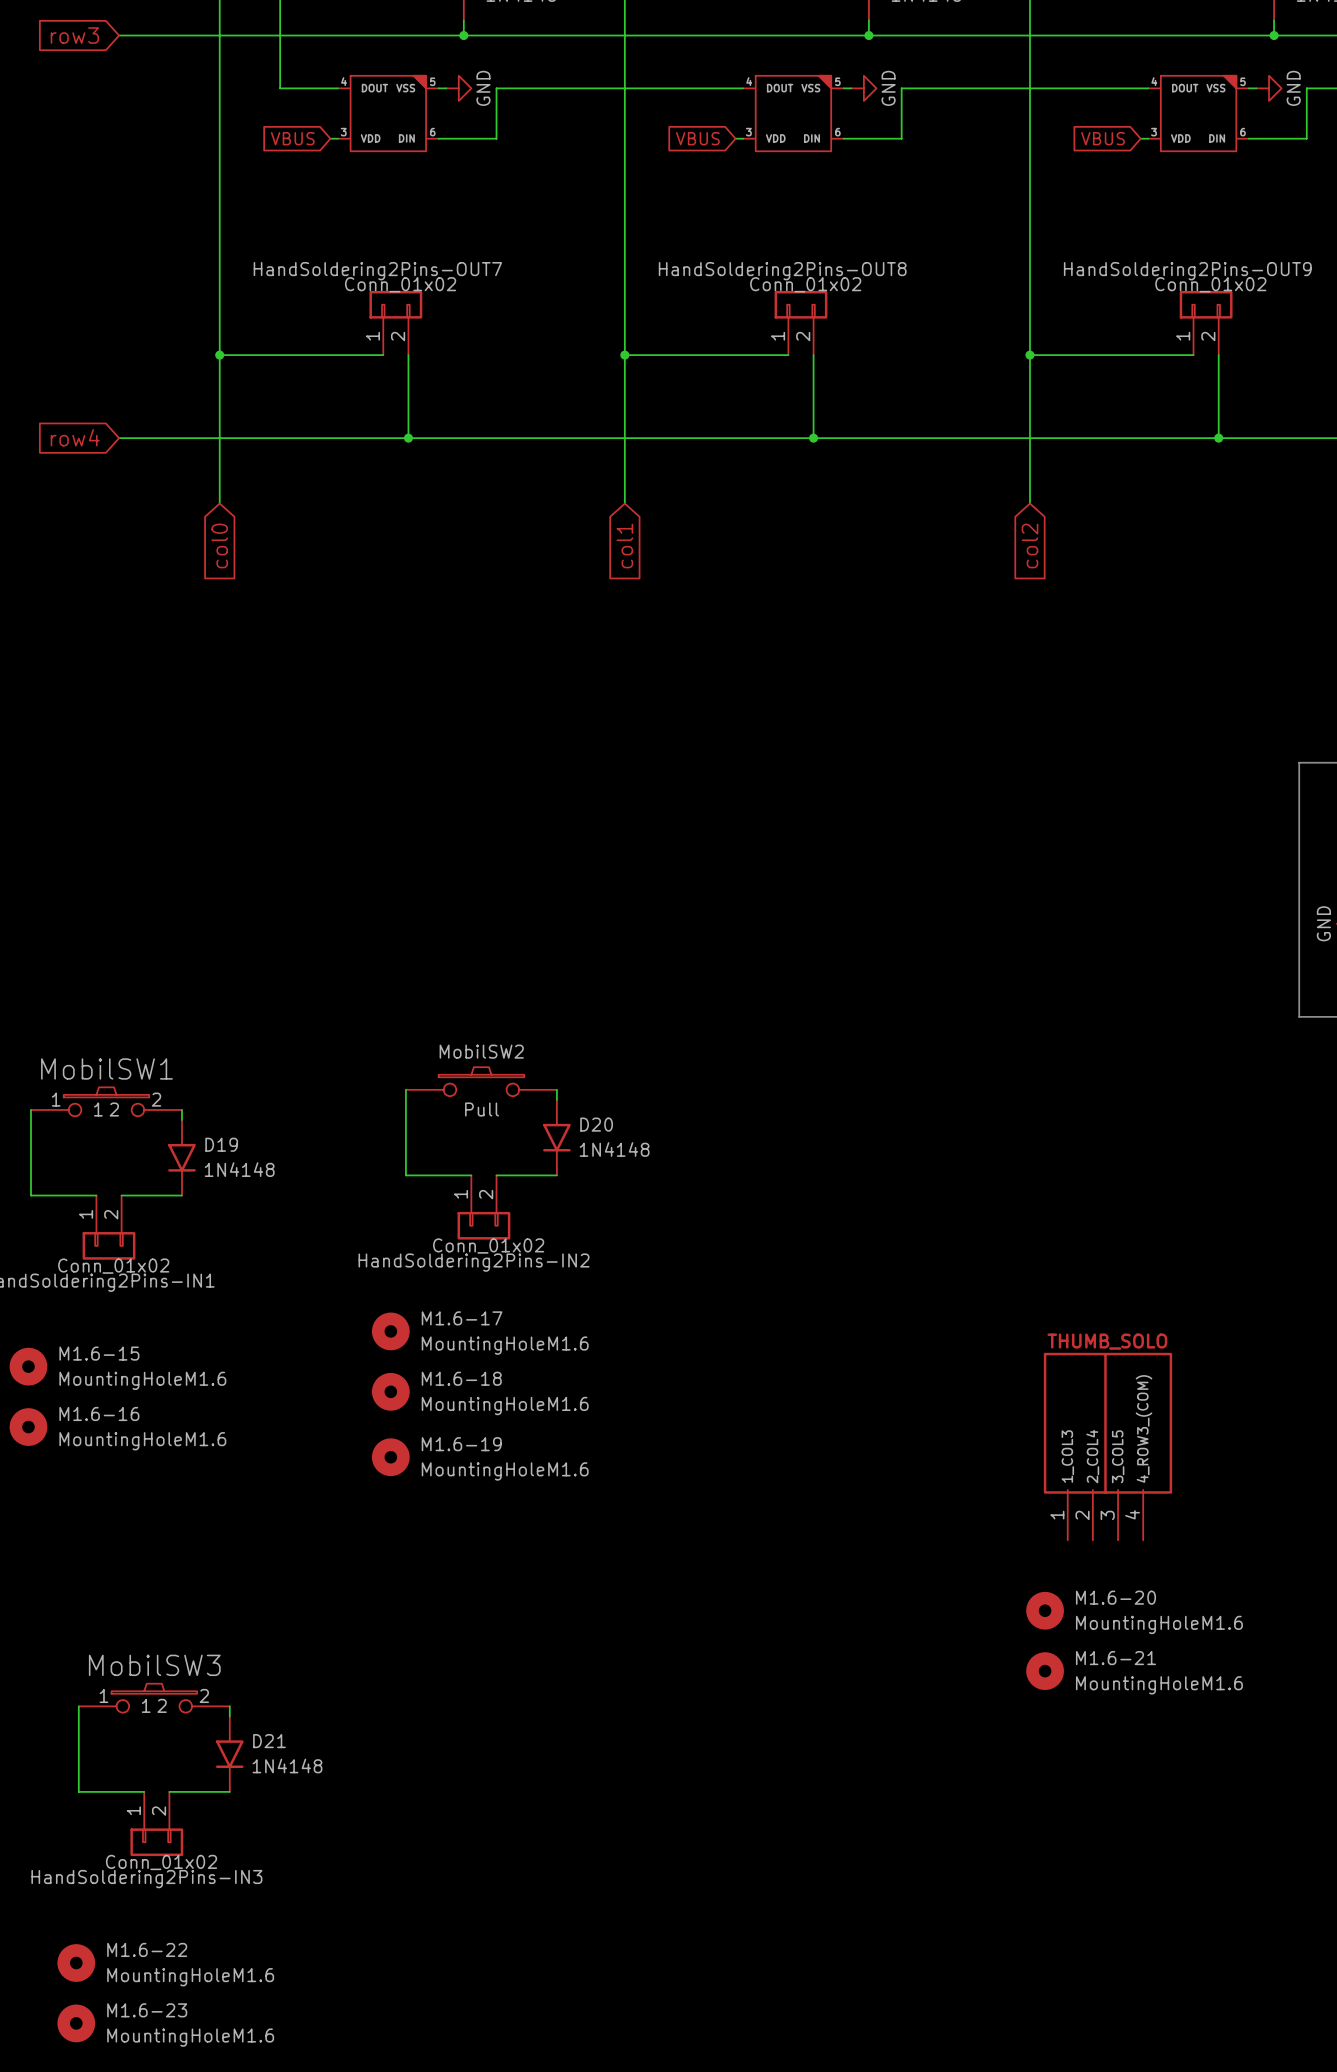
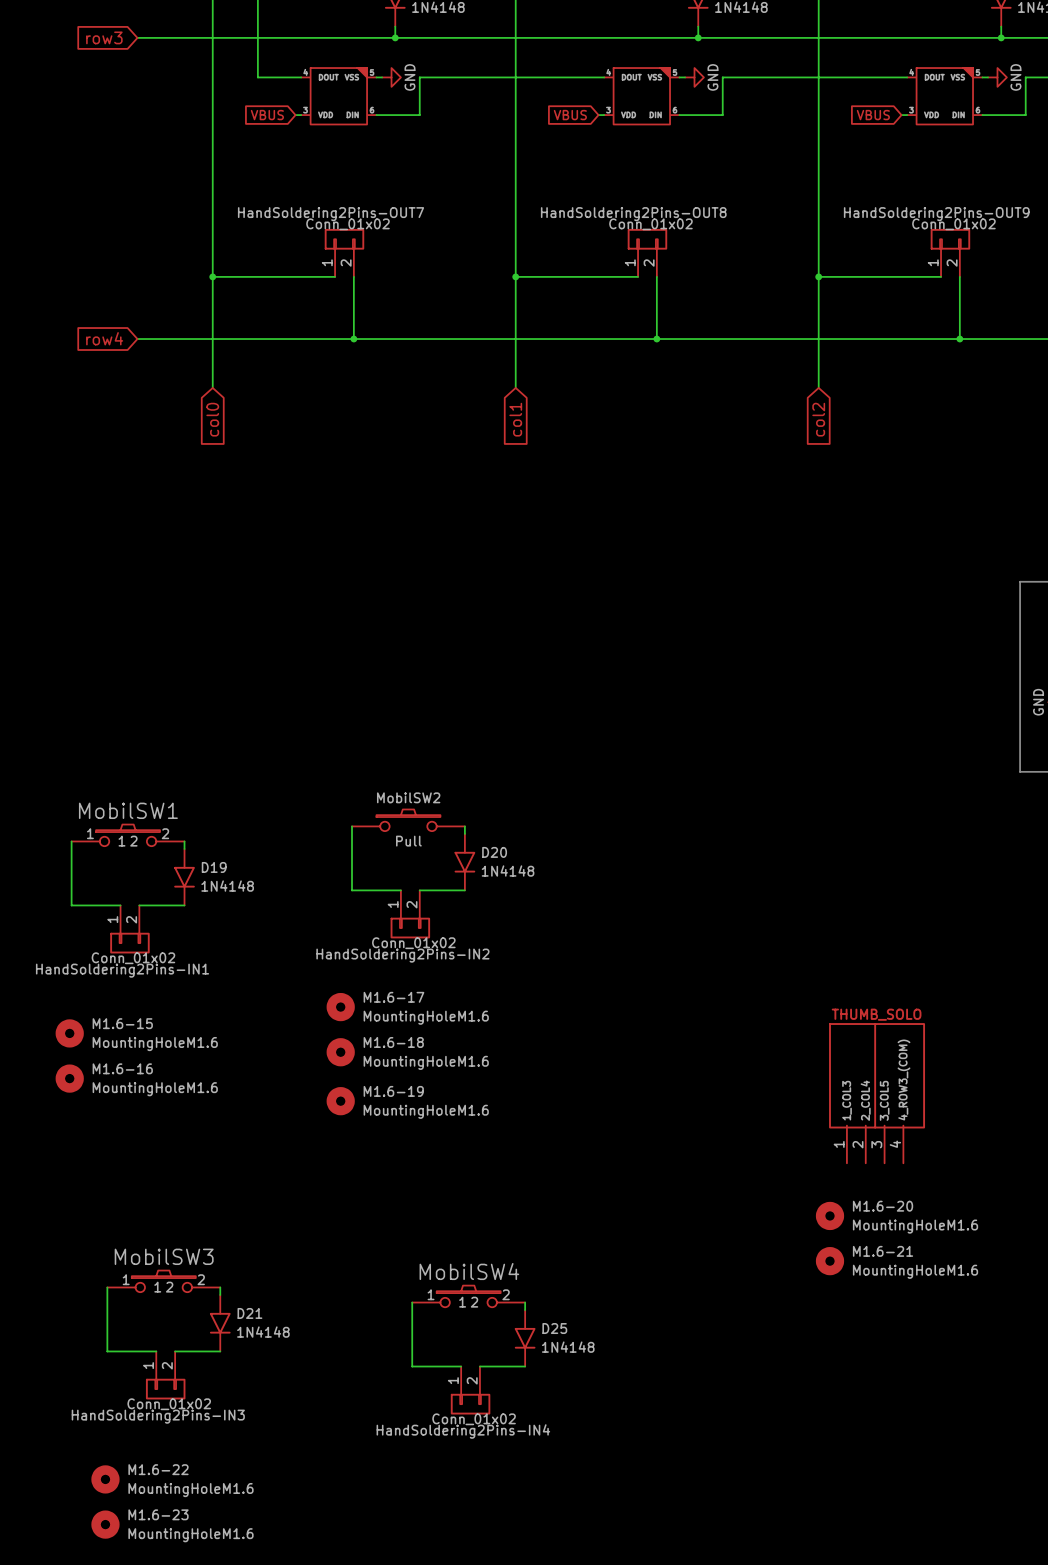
MobilSW4: none -> (468, 1296)
wire: none -> (412, 1302) (412, 1366) (461, 1366)
wire: none -> (525, 1302) (525, 1310)
D25: none -> 1N4148 (525, 1338)
wire: none -> (479, 1366) (525, 1366)
HandSoldering2Pins-IN4: none -> Conn_01x02 (470, 1390)

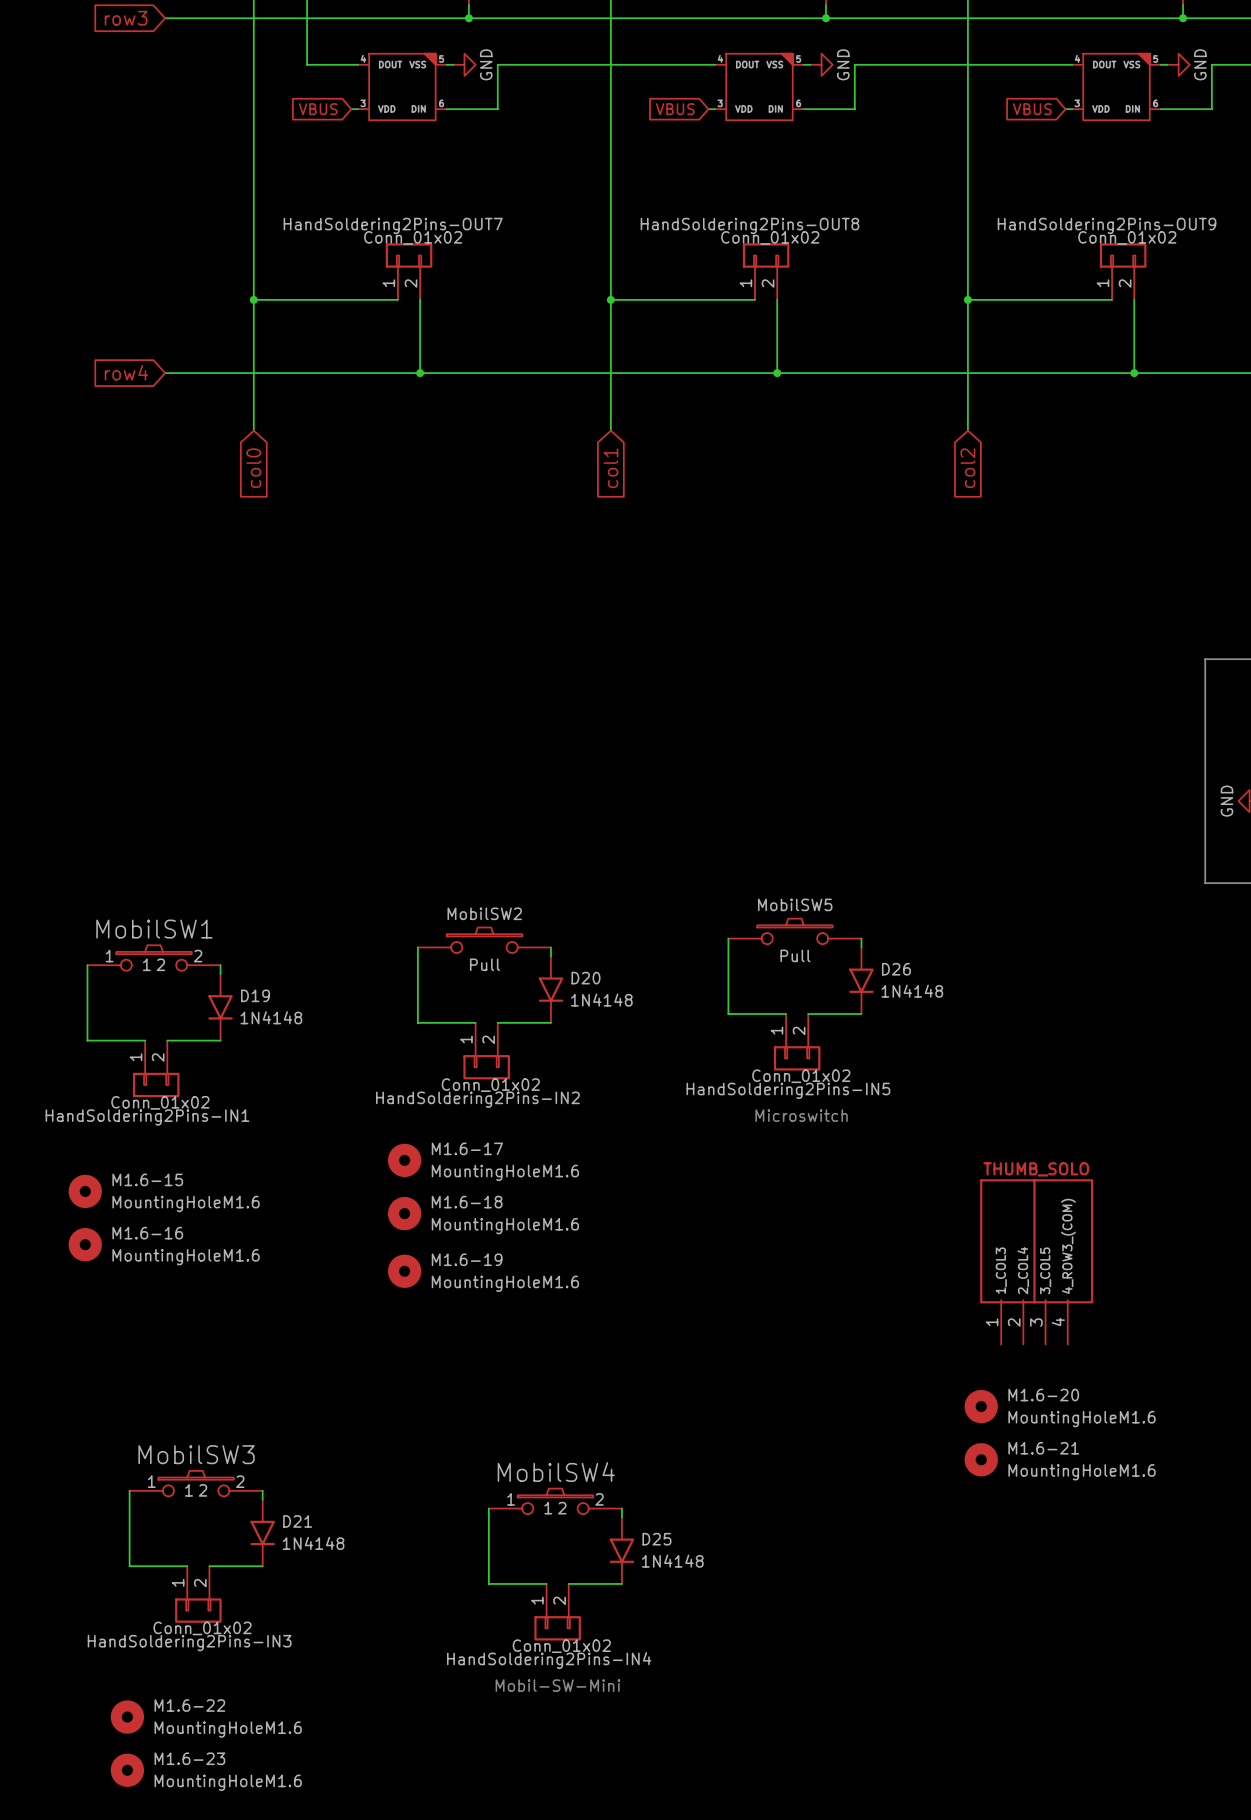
MobilSW5: none -> Pull (794, 931)
wire: none -> (728, 938) (728, 1014) (786, 1014)
wire: none -> (861, 938) (861, 947)
D26: none -> 1N4148 (861, 980)
wire: none -> (808, 1014) (861, 1014)
HandSoldering2Pins-IN5: none -> Conn_01x02 (797, 1042)
text: none -> Microswitch (801, 1115)
text: none -> Mobil-SW-Mini (557, 1685)

